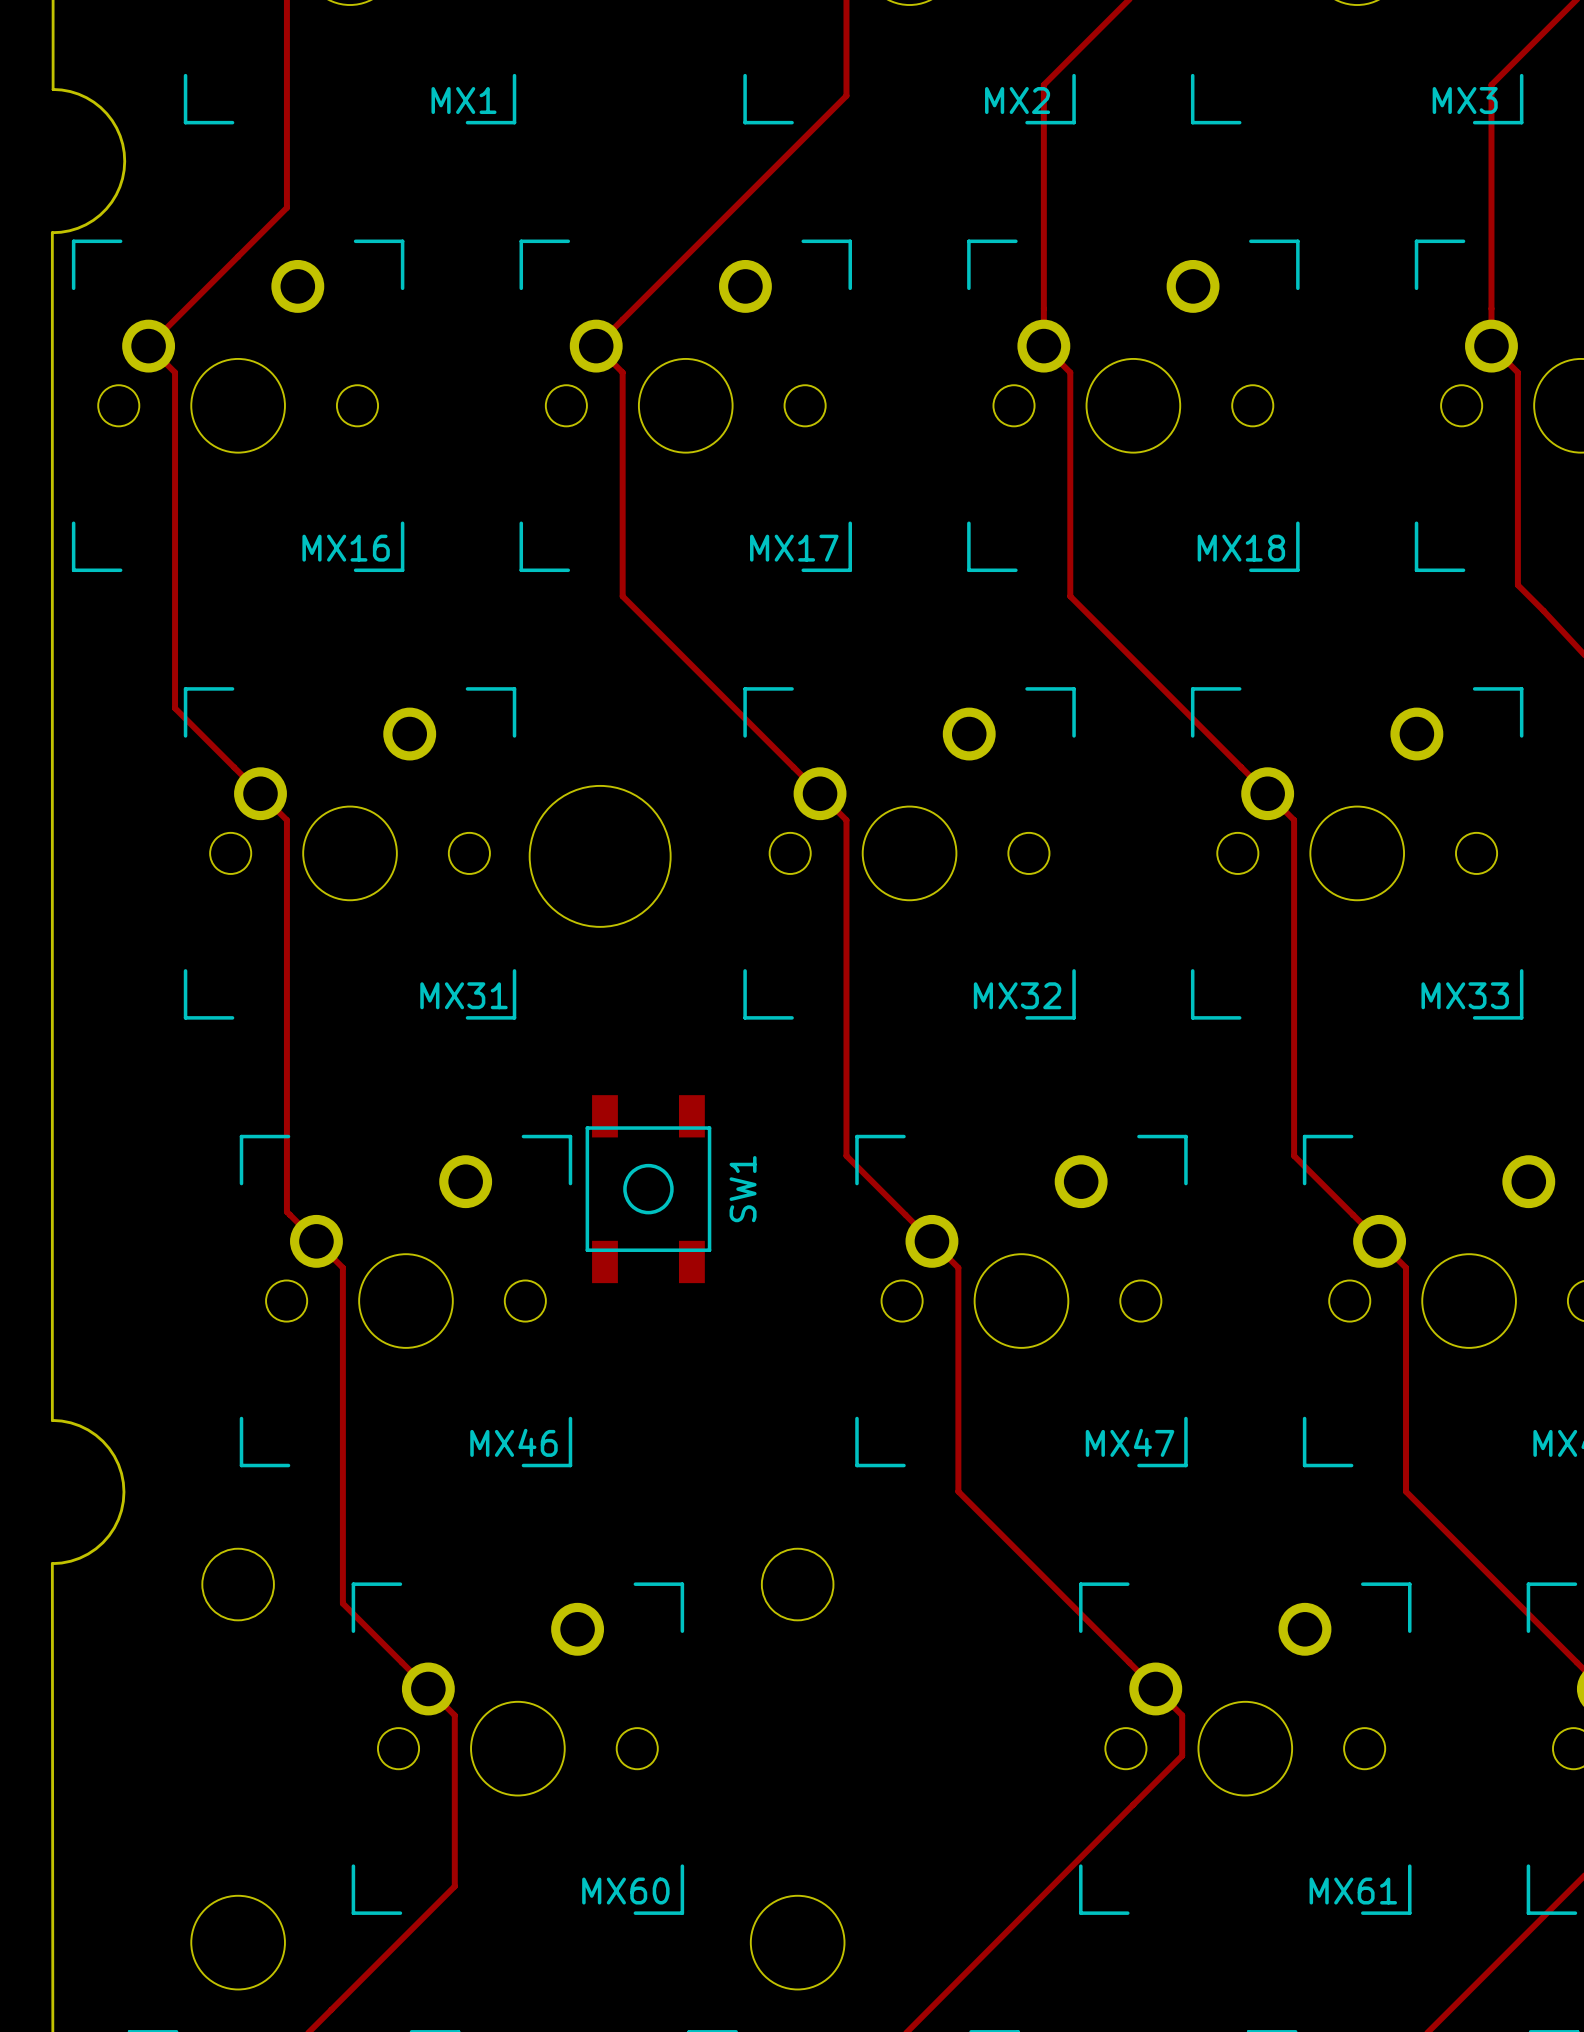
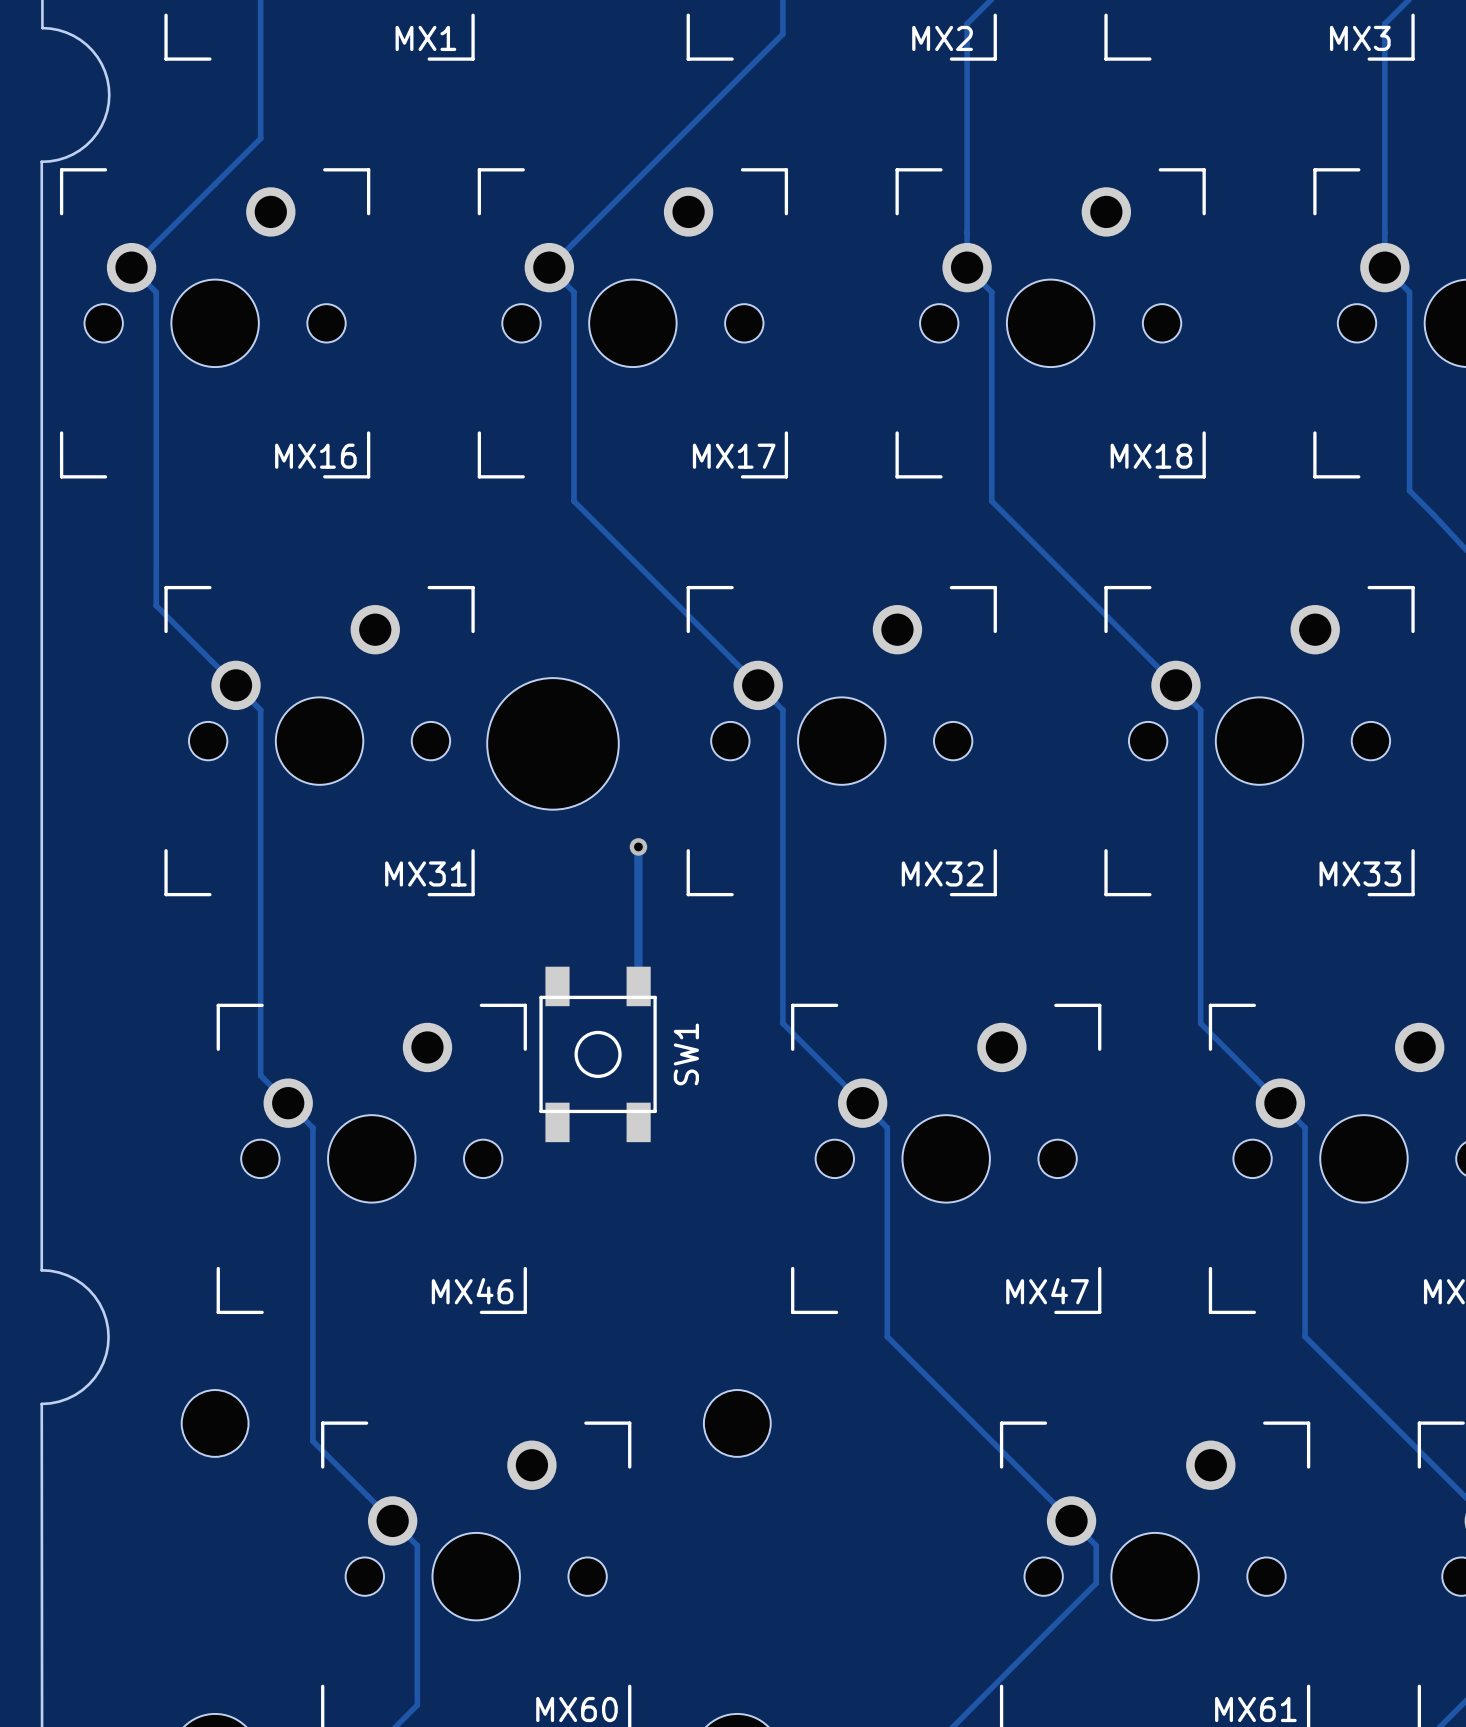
track: none -> (638, 846) (638, 986)
via: none -> (638, 846)

